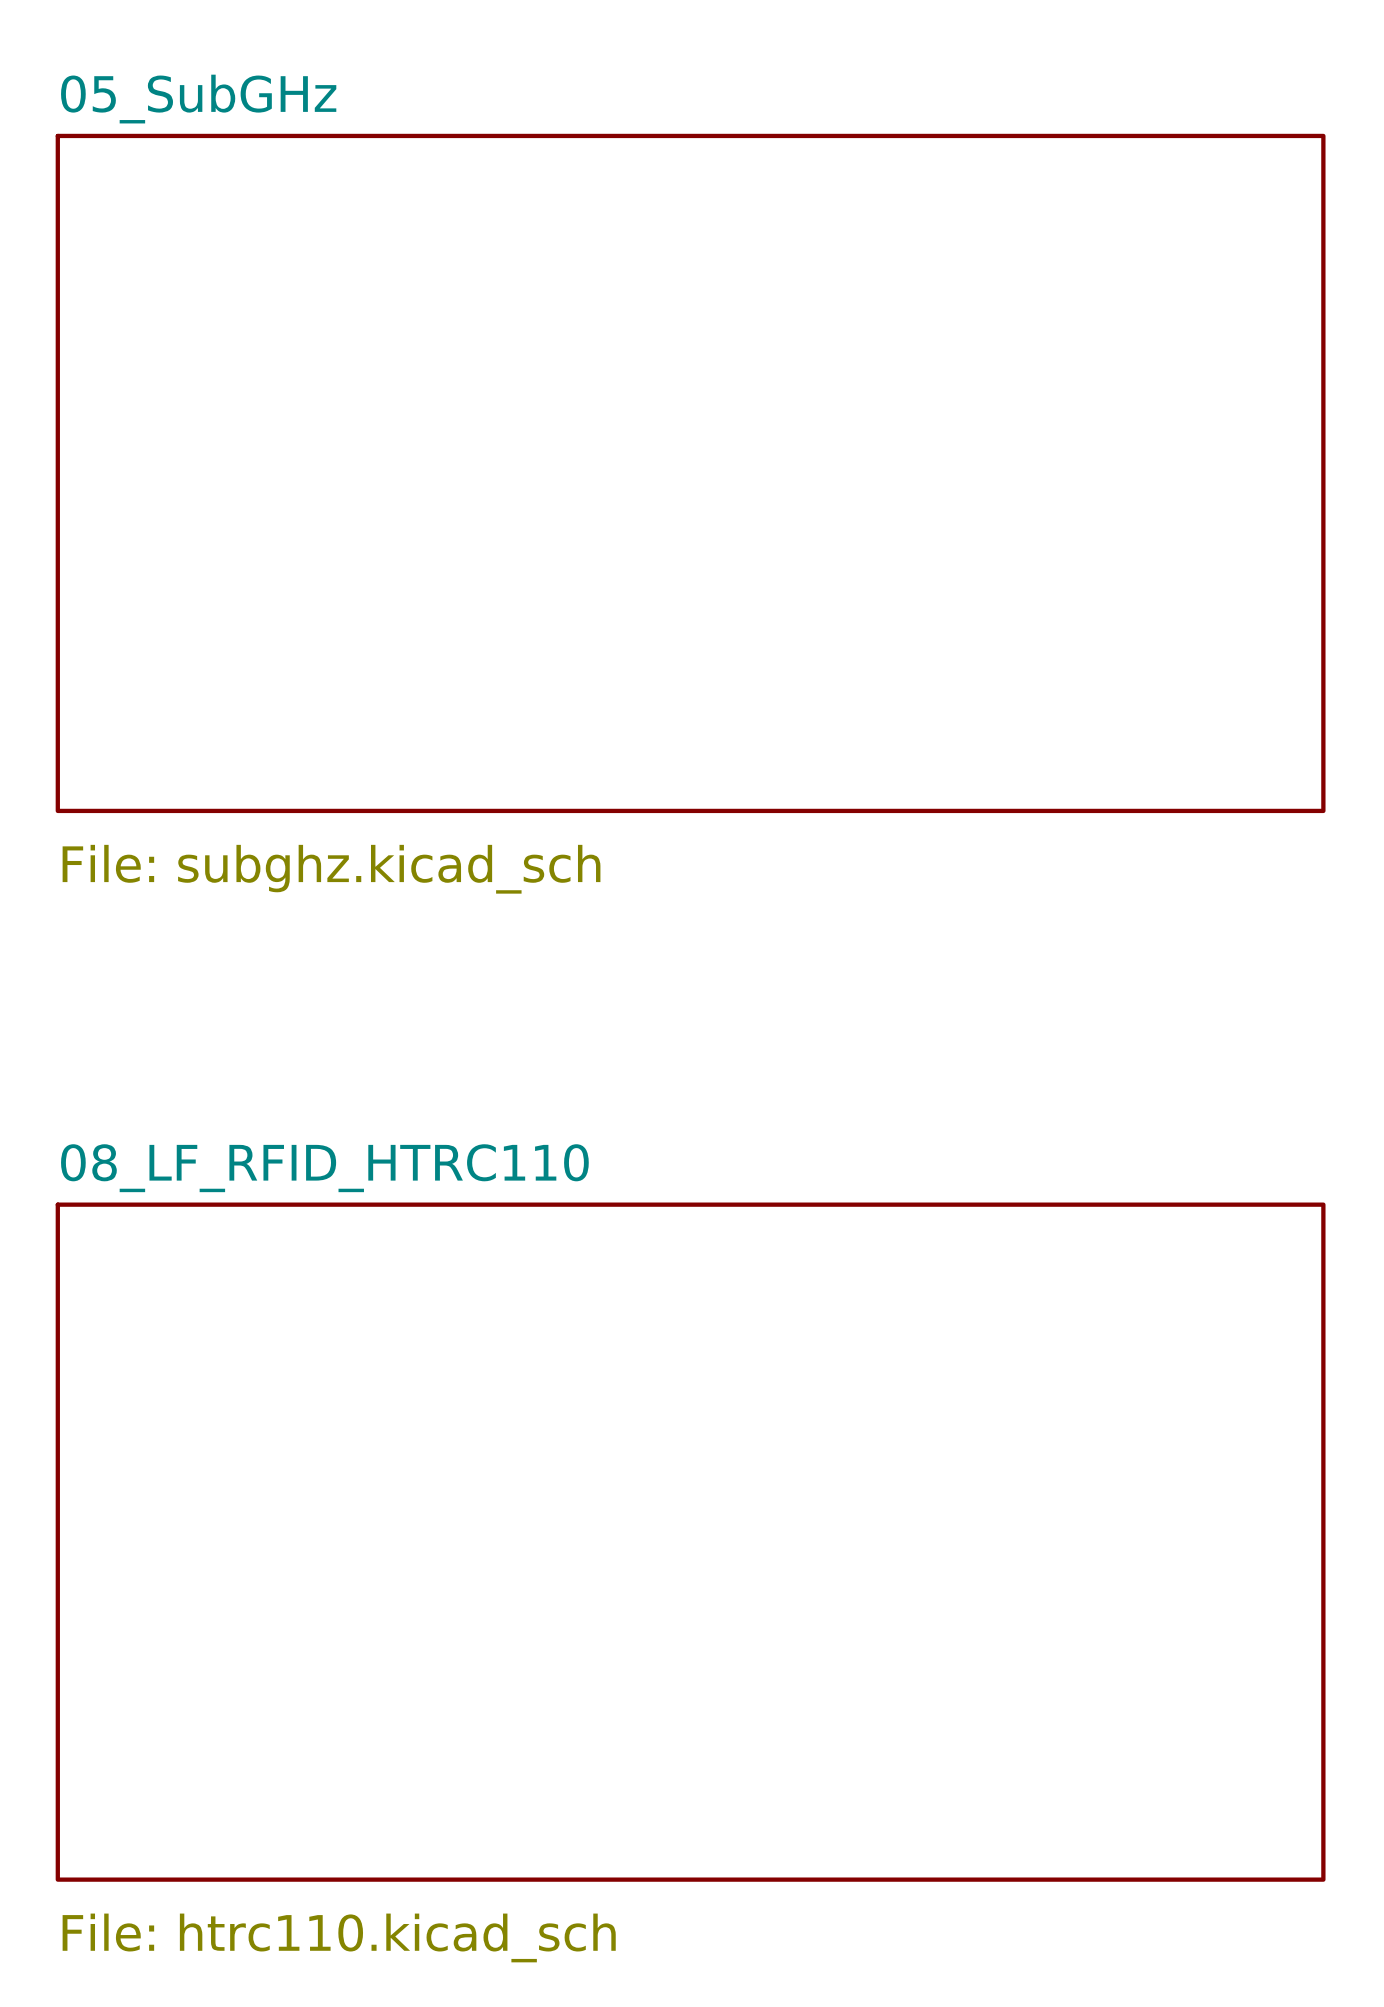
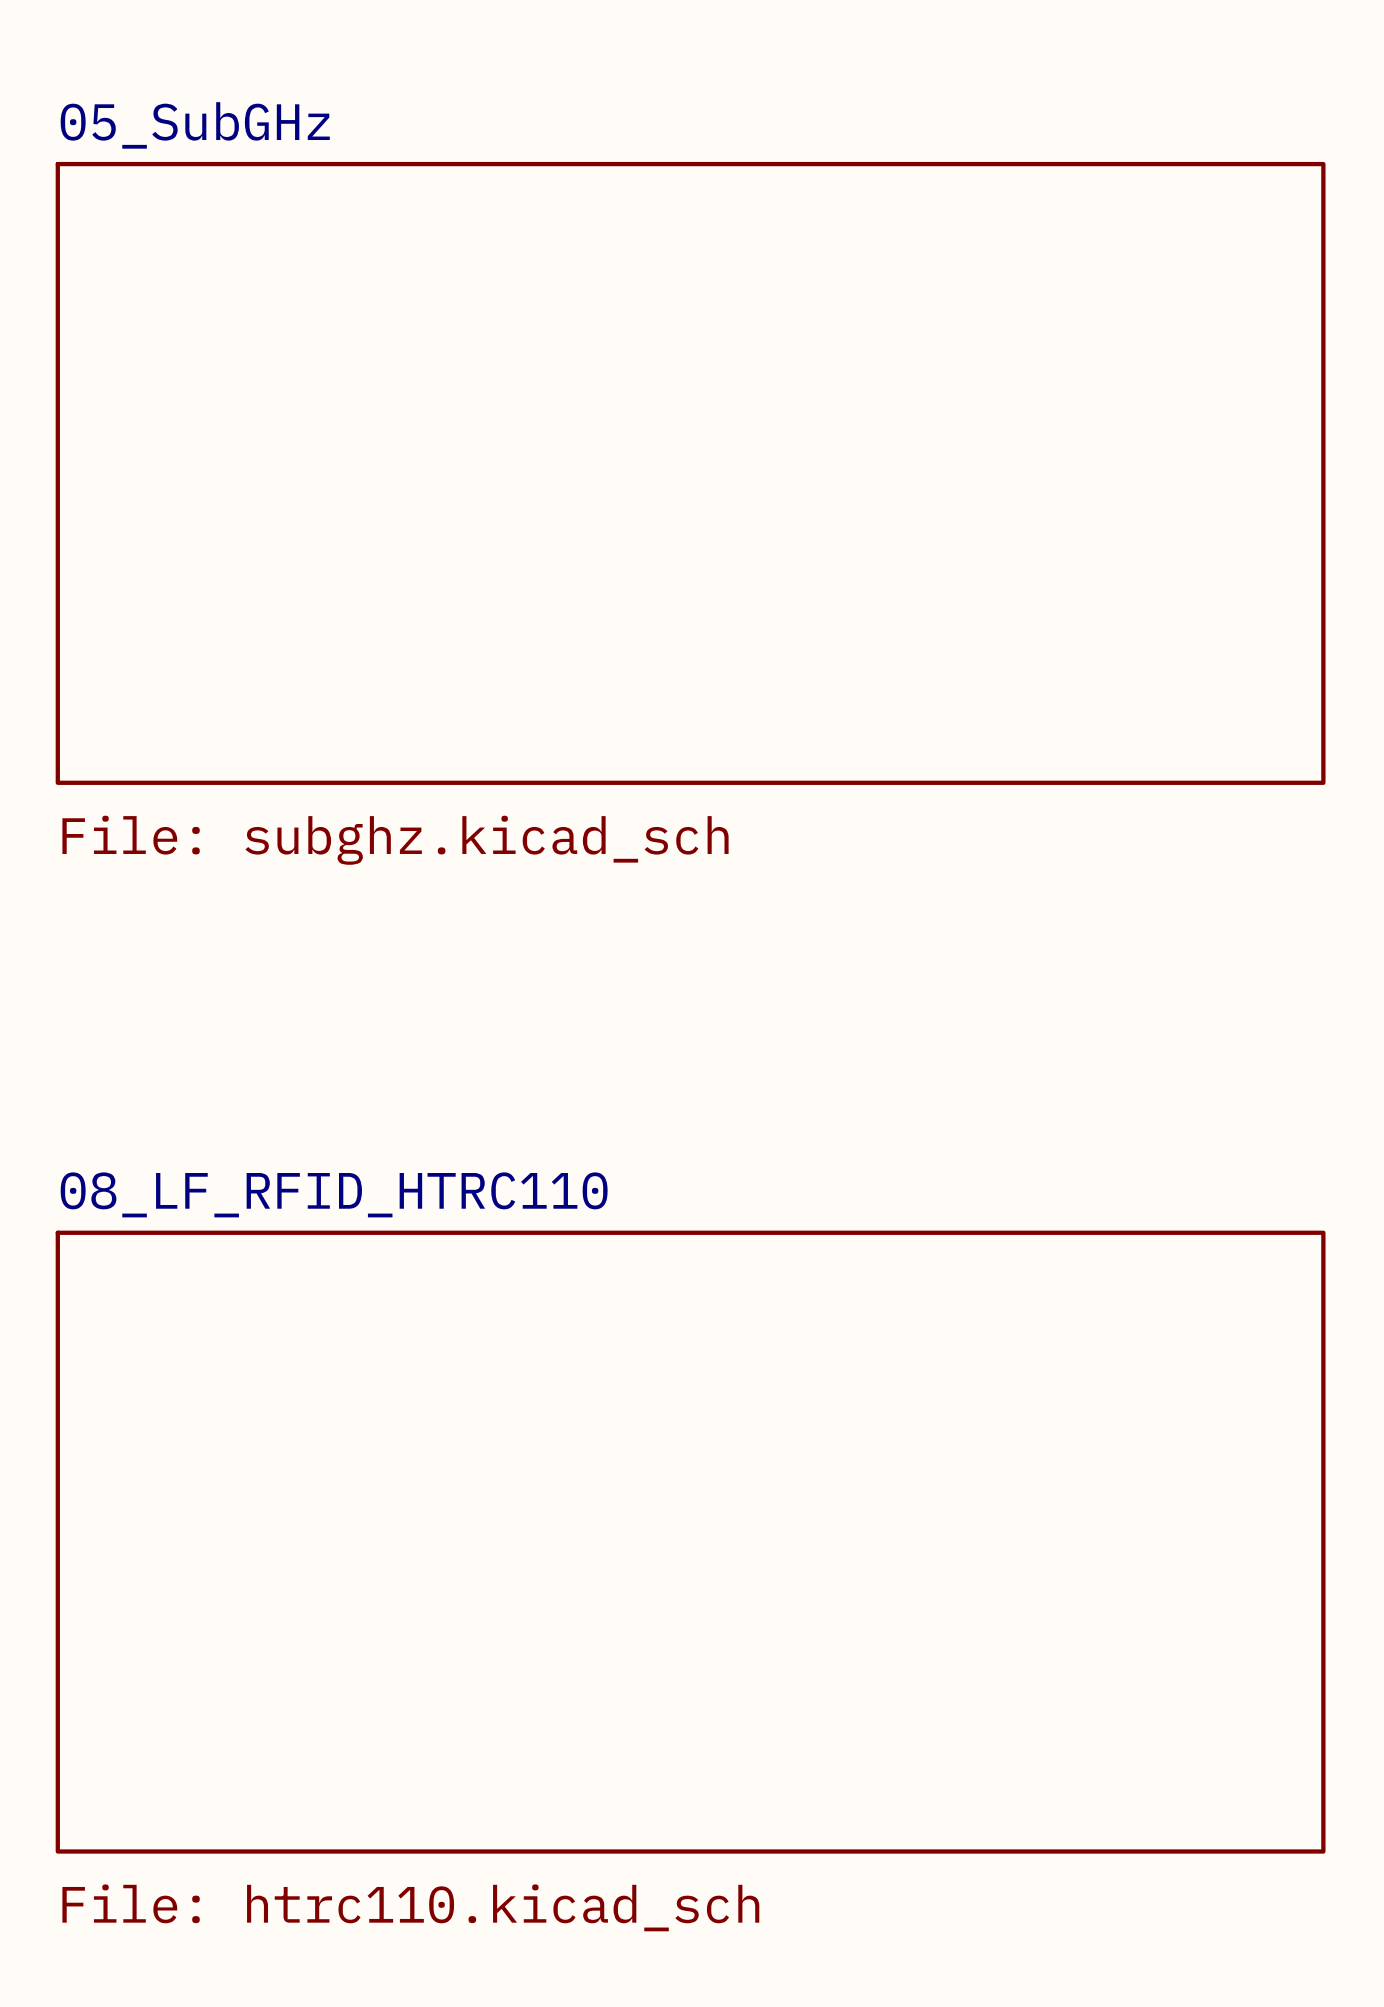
sheet 05_SubGHz shape: [55, 133, 1326, 814] -> [55, 161, 1326, 785]
sheet 08_LF_RFID_HTRC110 shape: [55, 1202, 1326, 1882] -> [55, 1230, 1326, 1854]

